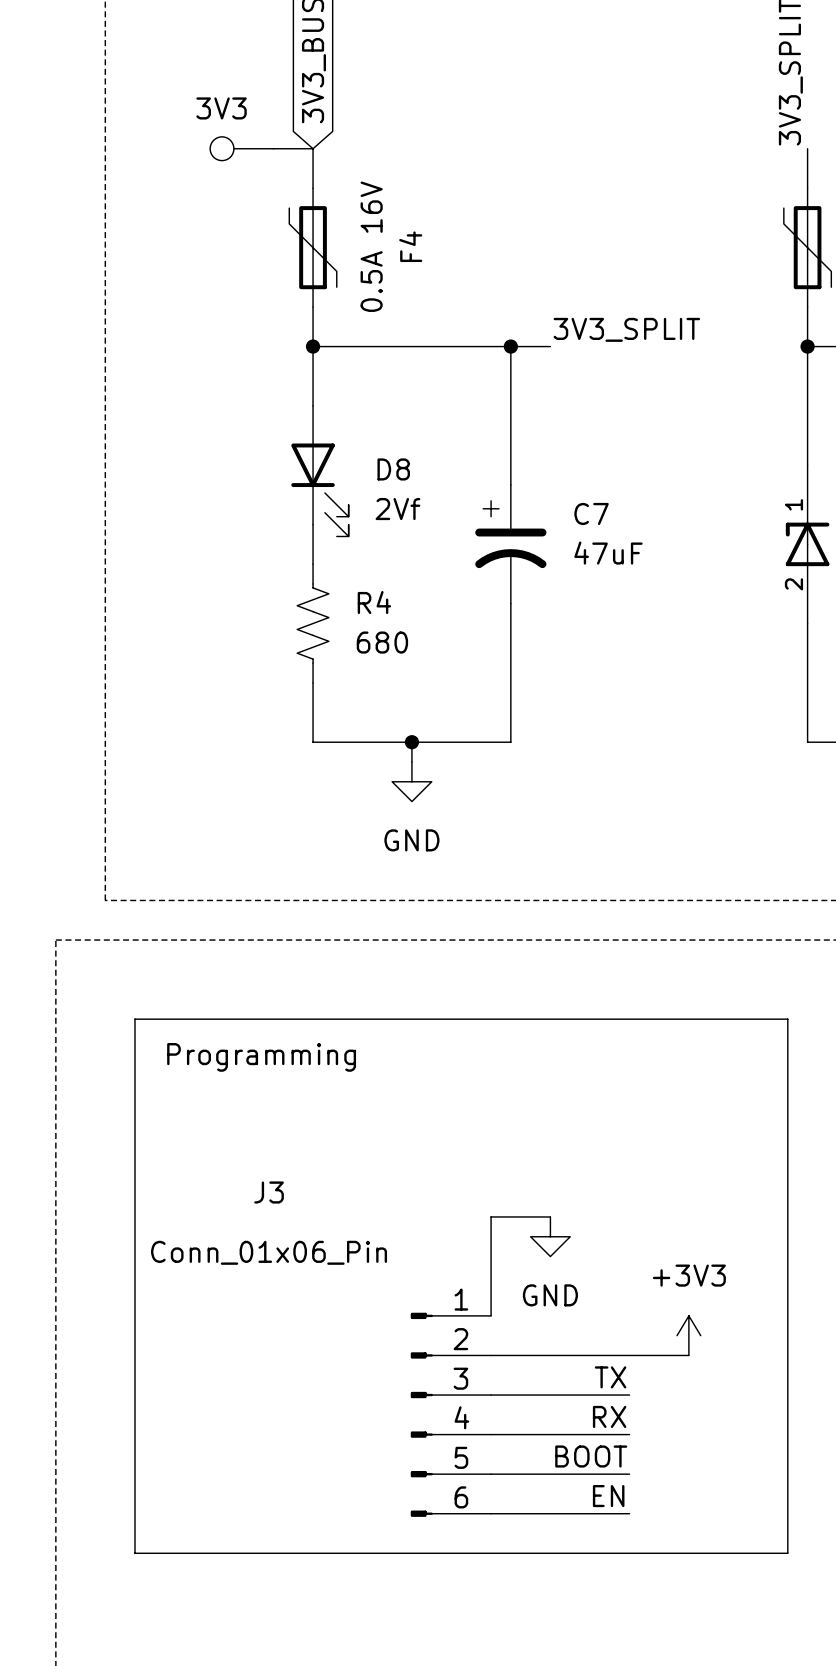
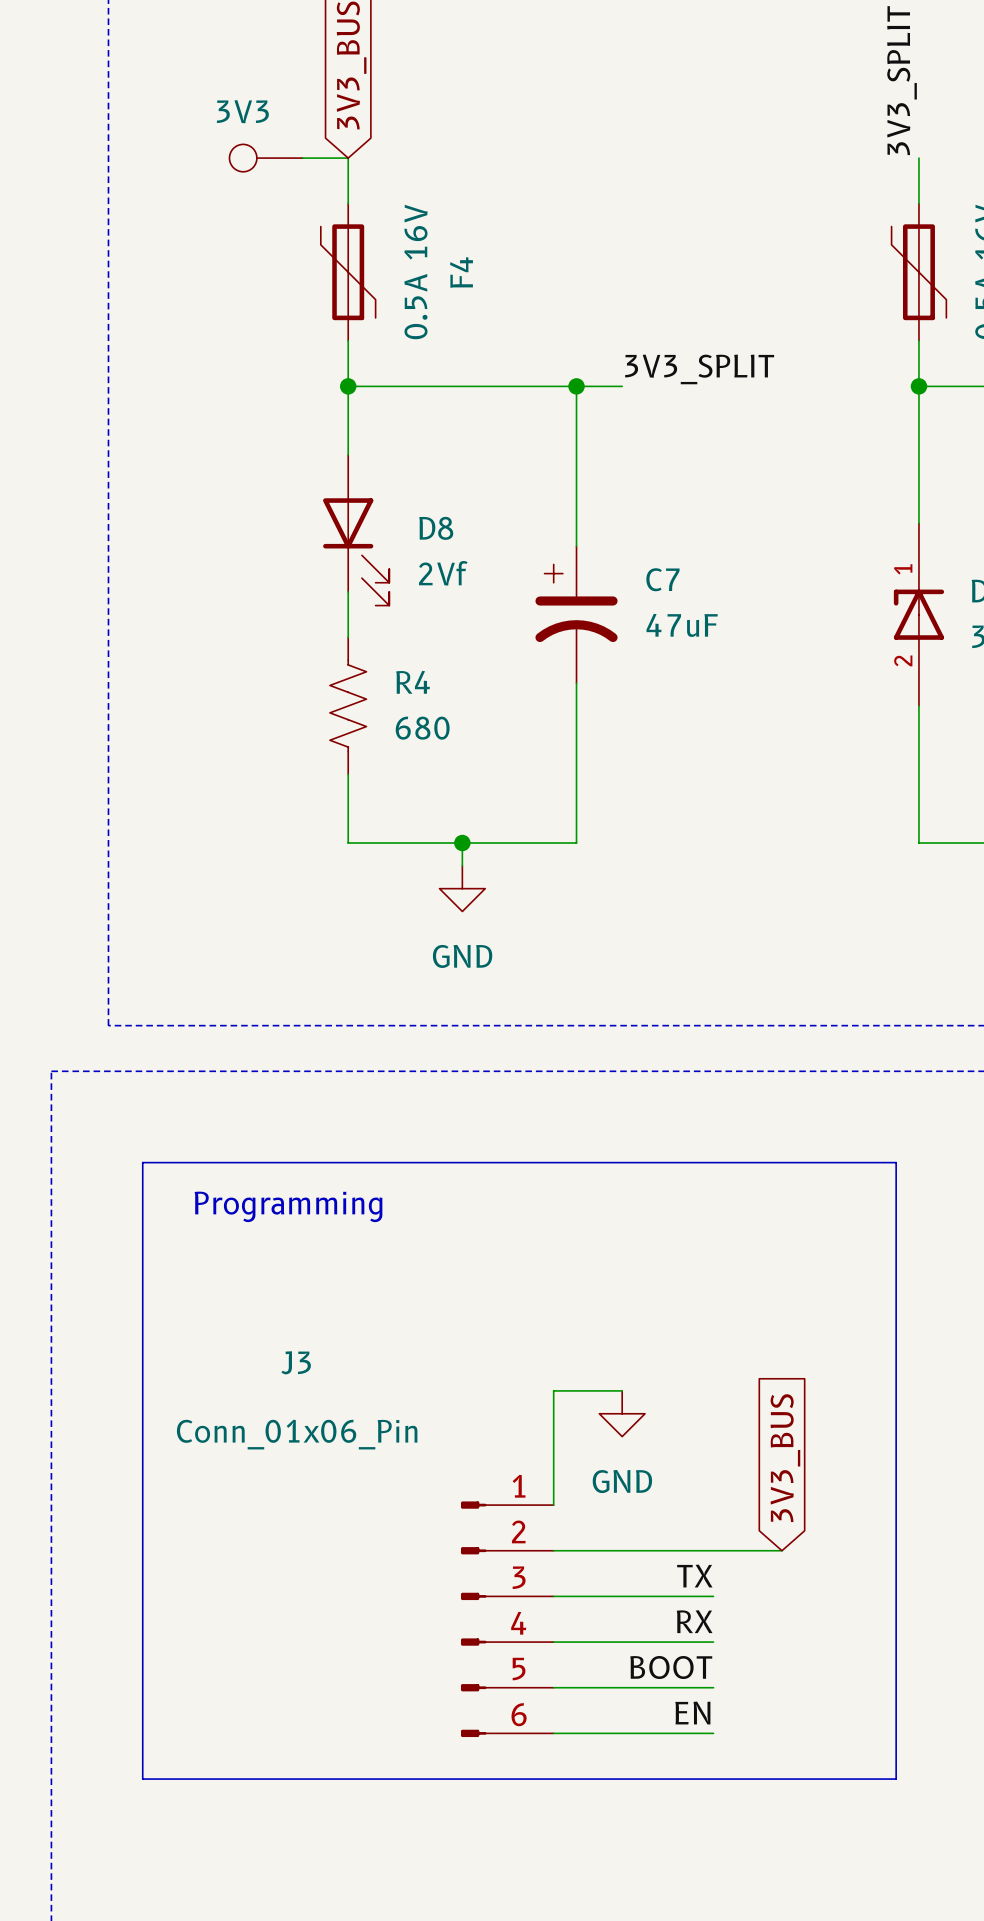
global label: none -> 3V3_BUS (785, 1458)
power symbol: +3V3 (688, 1335) -> none

